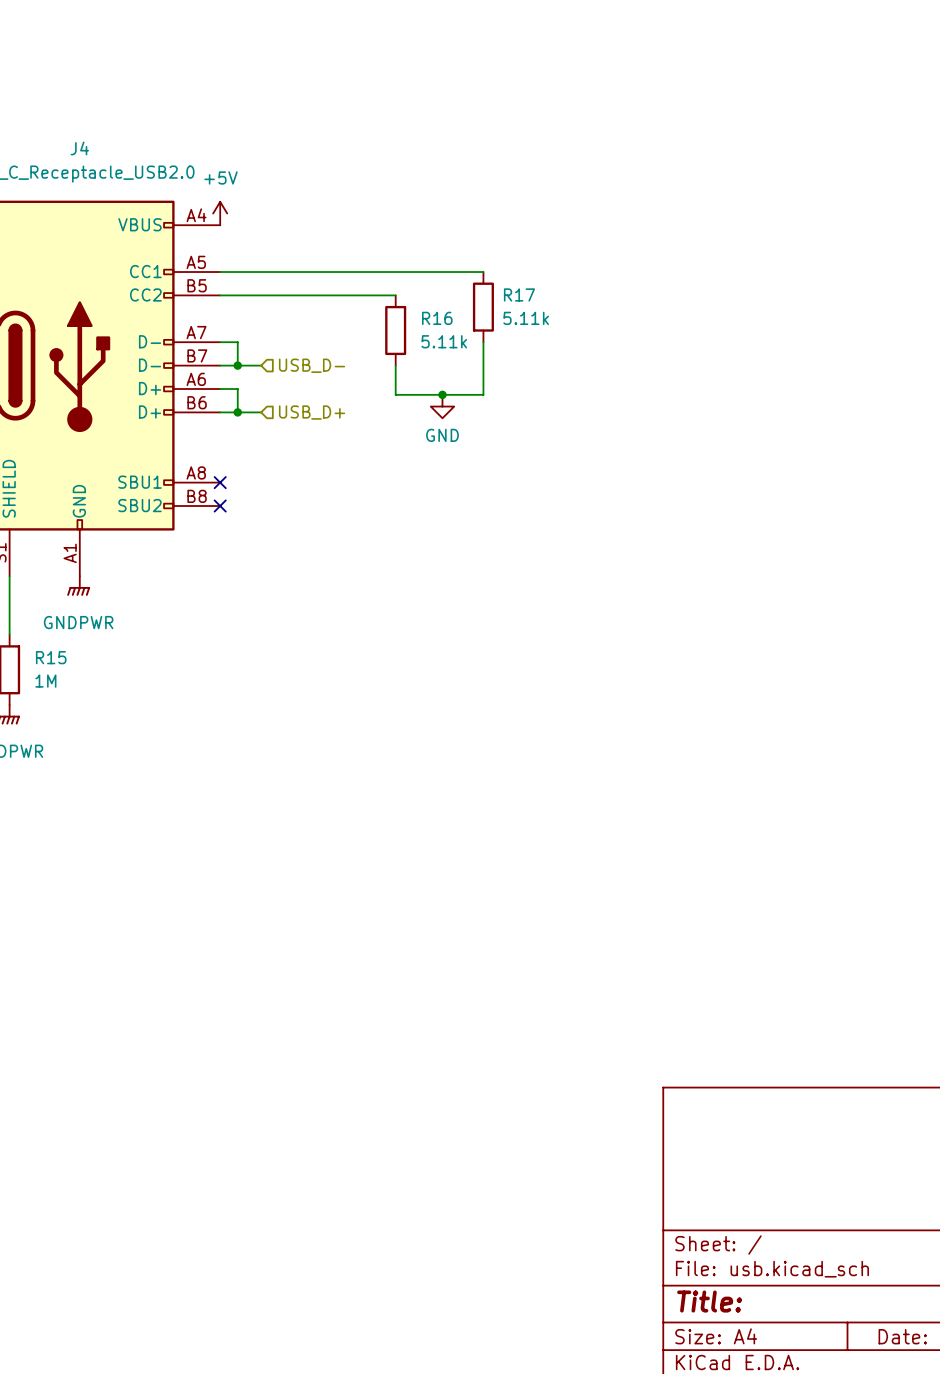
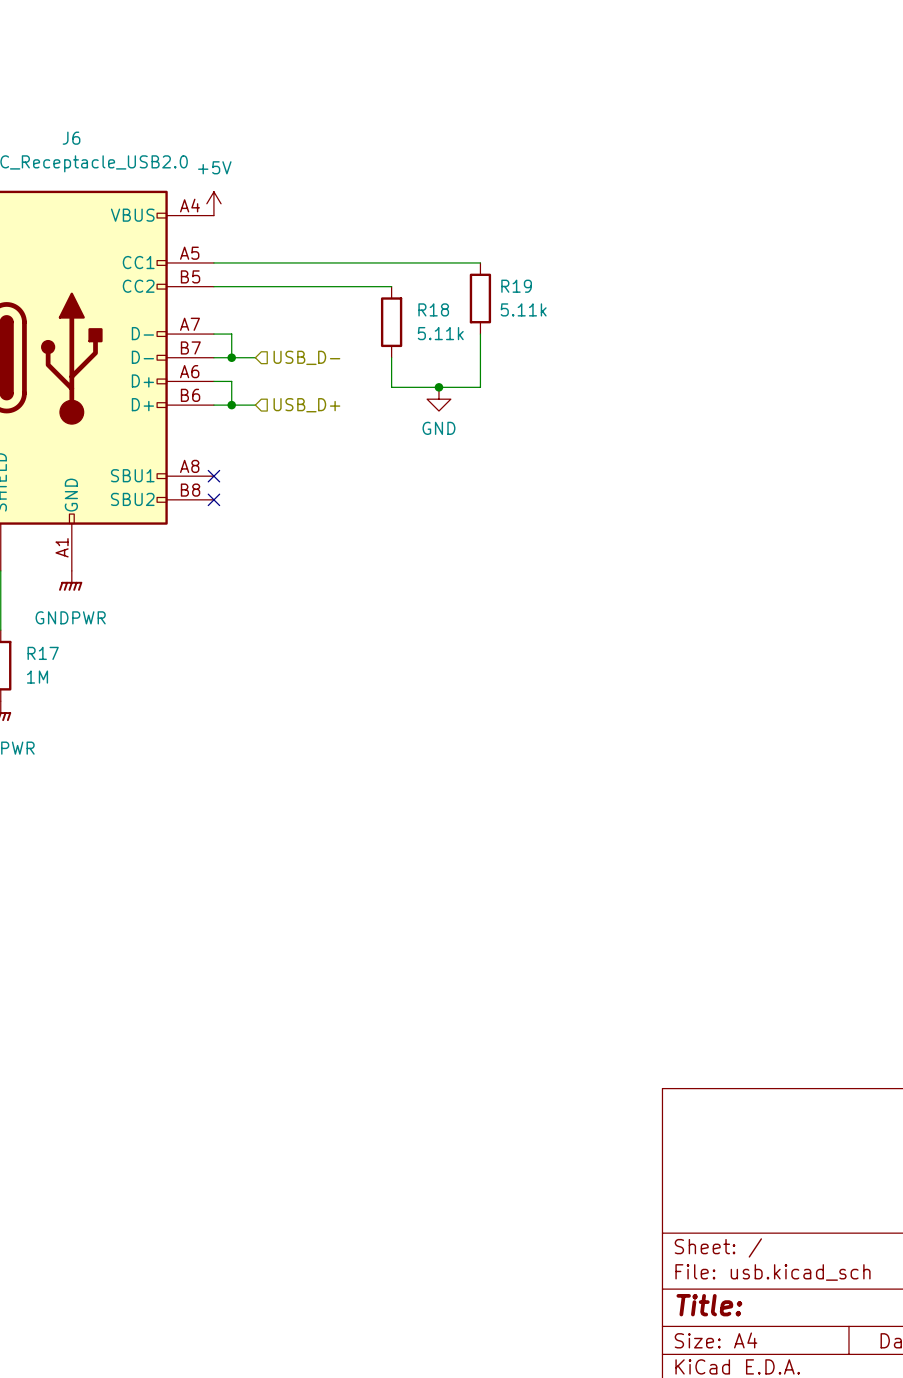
J4 name: J4 (79, 148) -> J6 (71, 138)
R17 name: R17 (519, 294) -> R19 (516, 286)
R16 name: R16 (437, 318) -> R18 (433, 309)
R15 name: R15 (51, 657) -> R17 (43, 653)

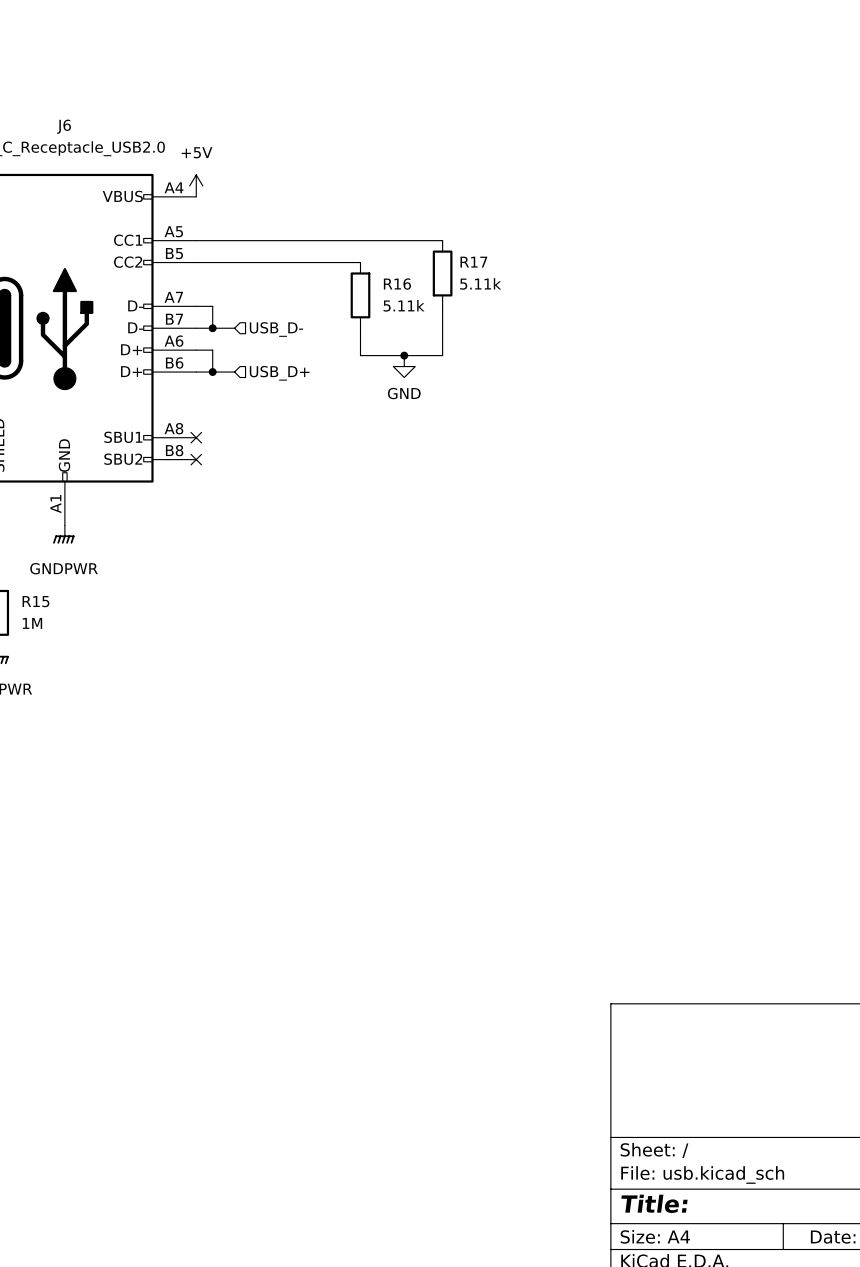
R19 name: R19 (516, 286) -> R17 (473, 262)
R18 name: R18 (433, 309) -> R16 (397, 284)
R17 name: R17 (43, 653) -> R15 (35, 601)

